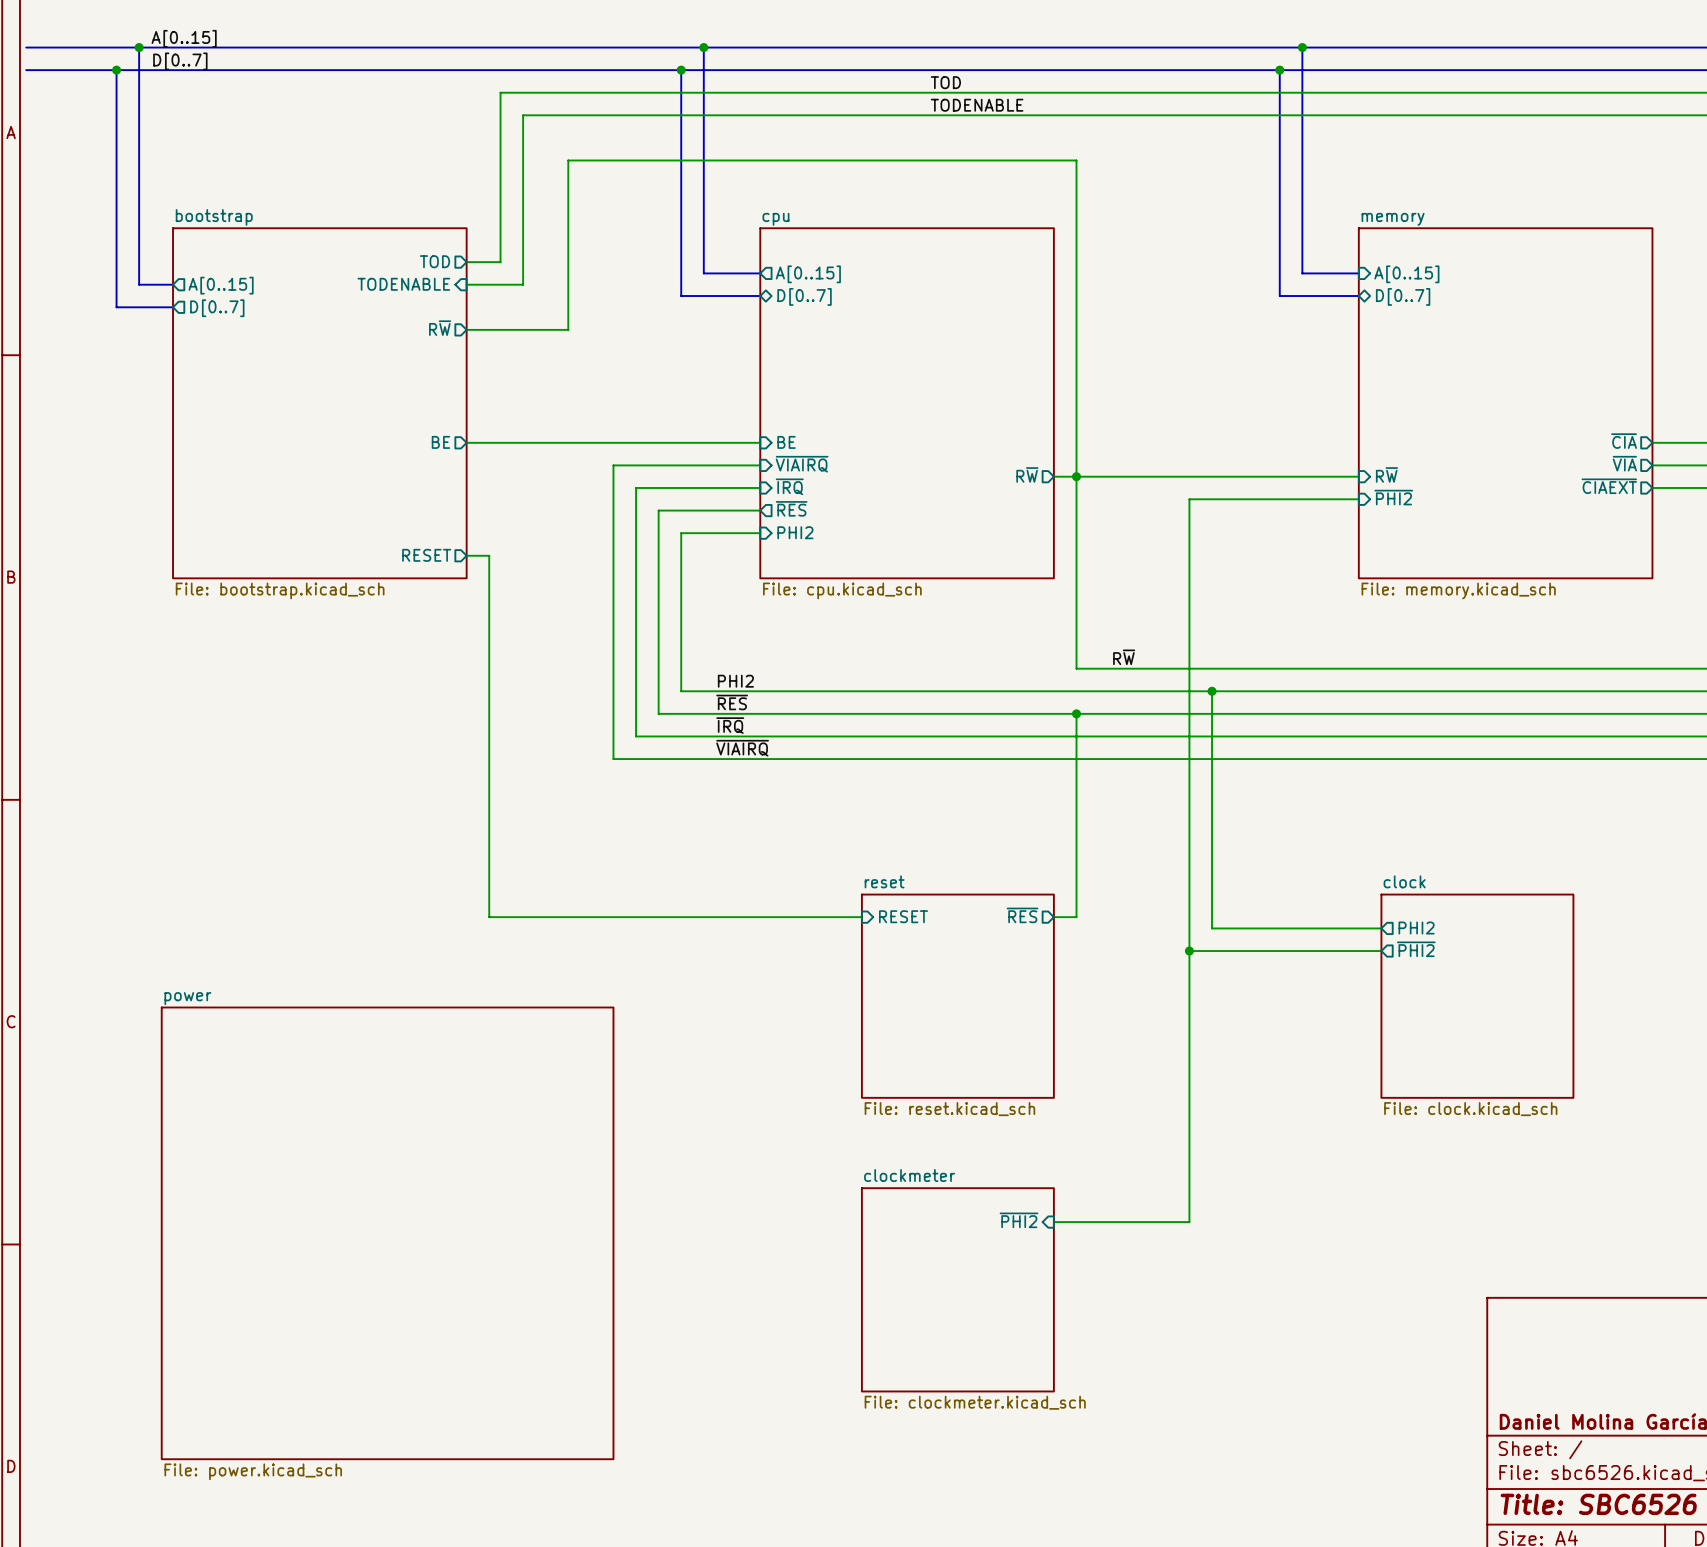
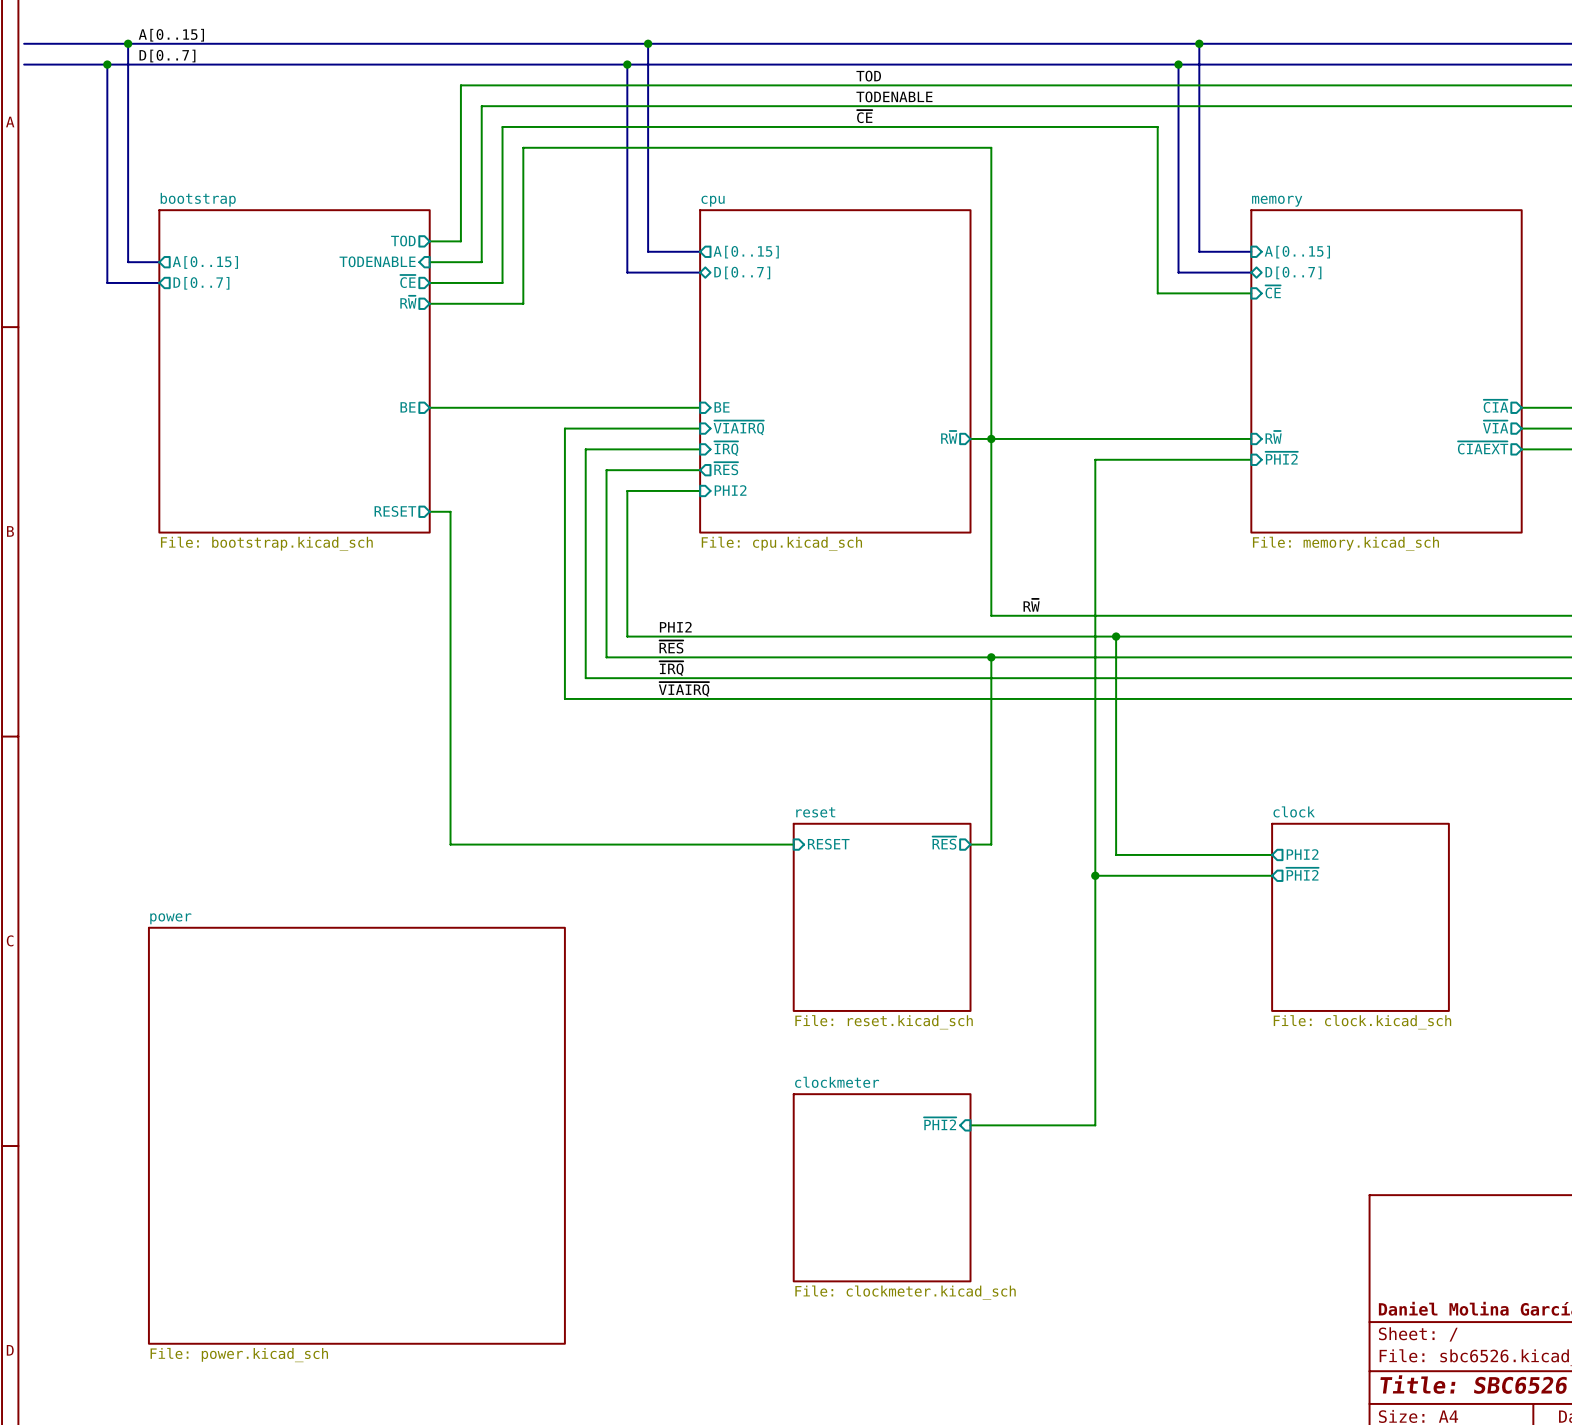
label: none -> ~{CE} (864, 116)
sheet pin: none -> ~{CE} (407, 281)
wire: none -> (429, 282) (502, 282) (502, 126) (1157, 126) (1157, 293) (1251, 293)
sheet pin: none -> ~{CE} (1273, 291)

